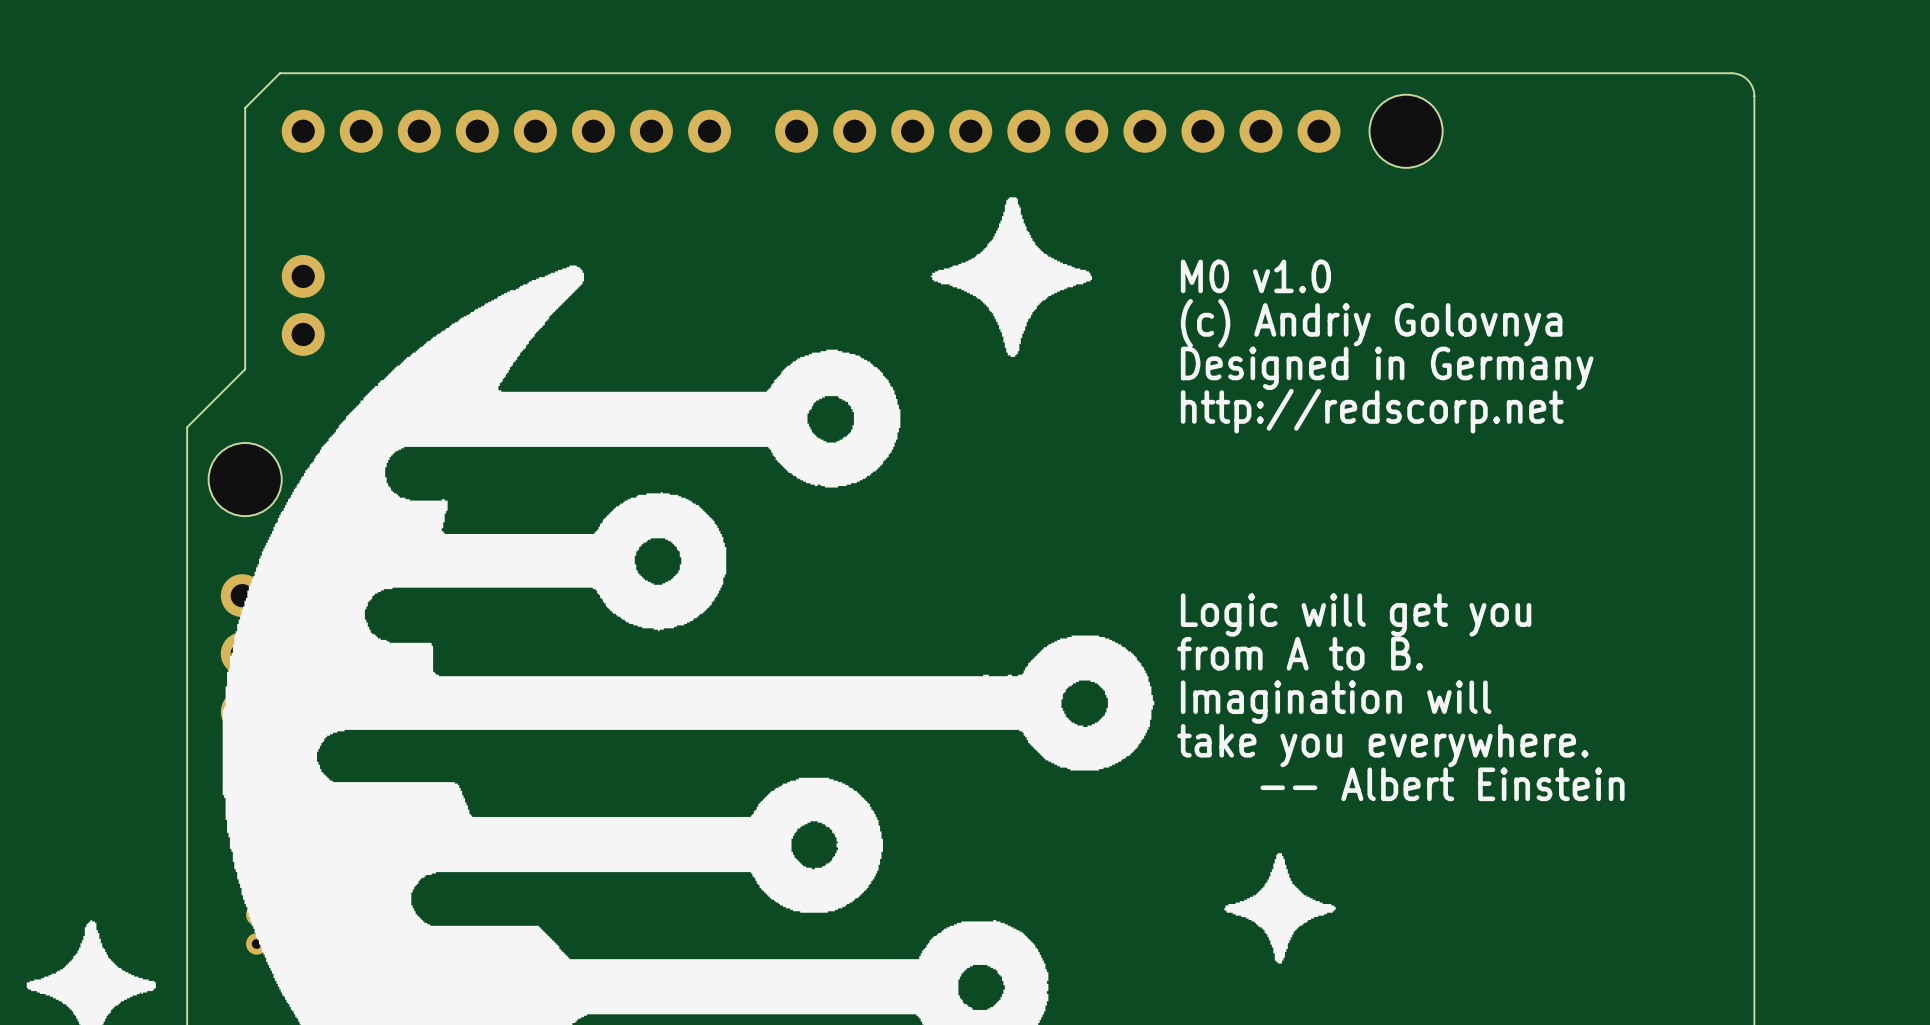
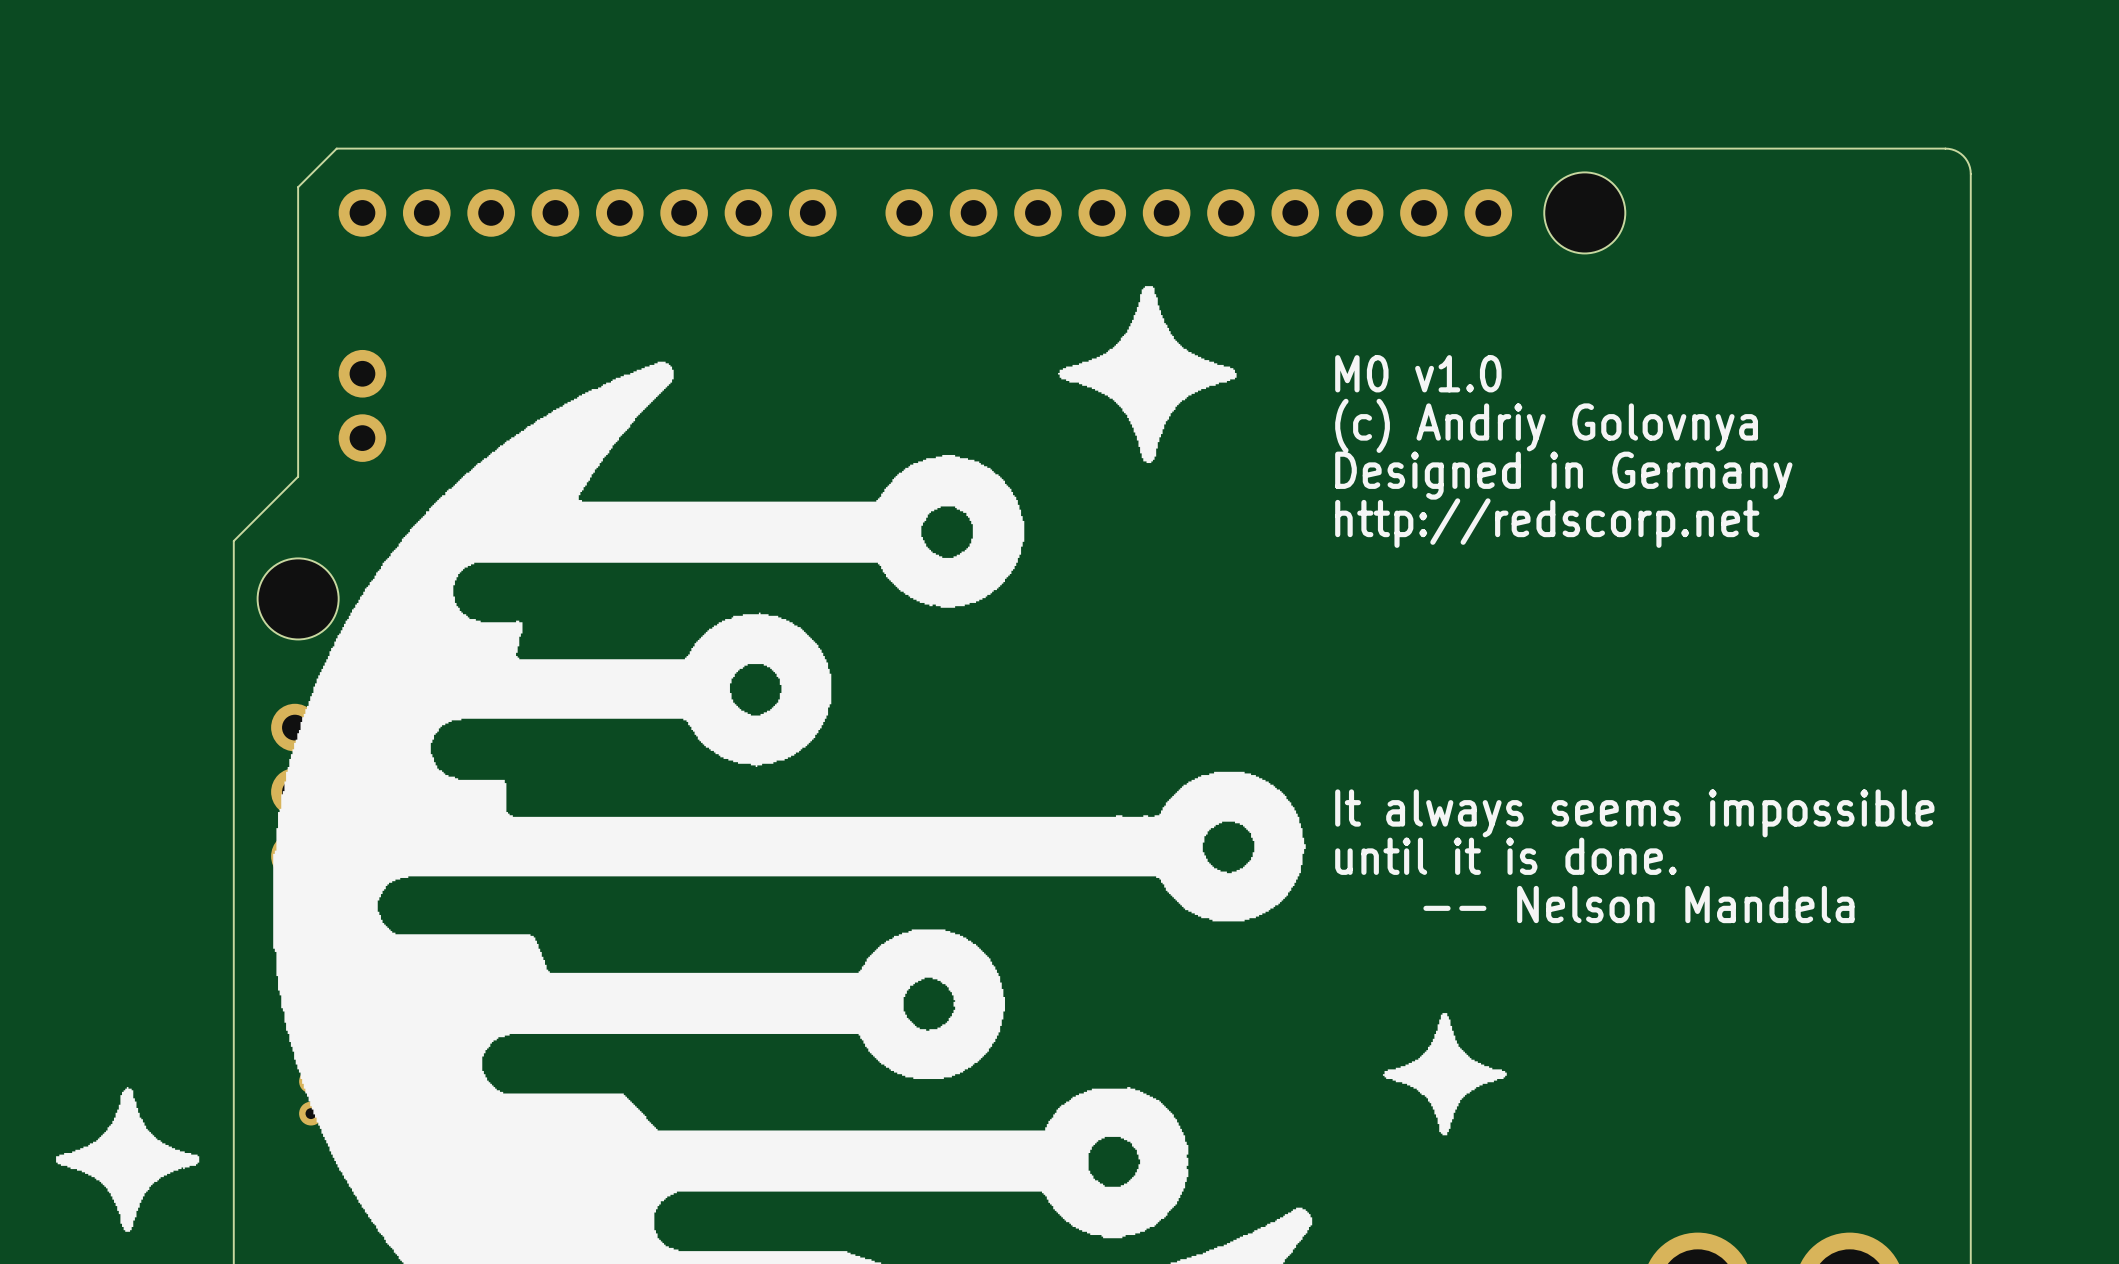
text: Logic will get you (1356, 615) -> none
text: from A to B. (1300, 653) -> none
text: none -> It always seems impossible (1634, 813)
text: Imagination will (1336, 702) -> none
text: none -> until it is done. (1505, 856)
text: take you everywhere. (1382, 745) -> none
text: none -> -- Nelson Mandela (1638, 904)
text: -- Albert Einstein (1442, 784) -> none

